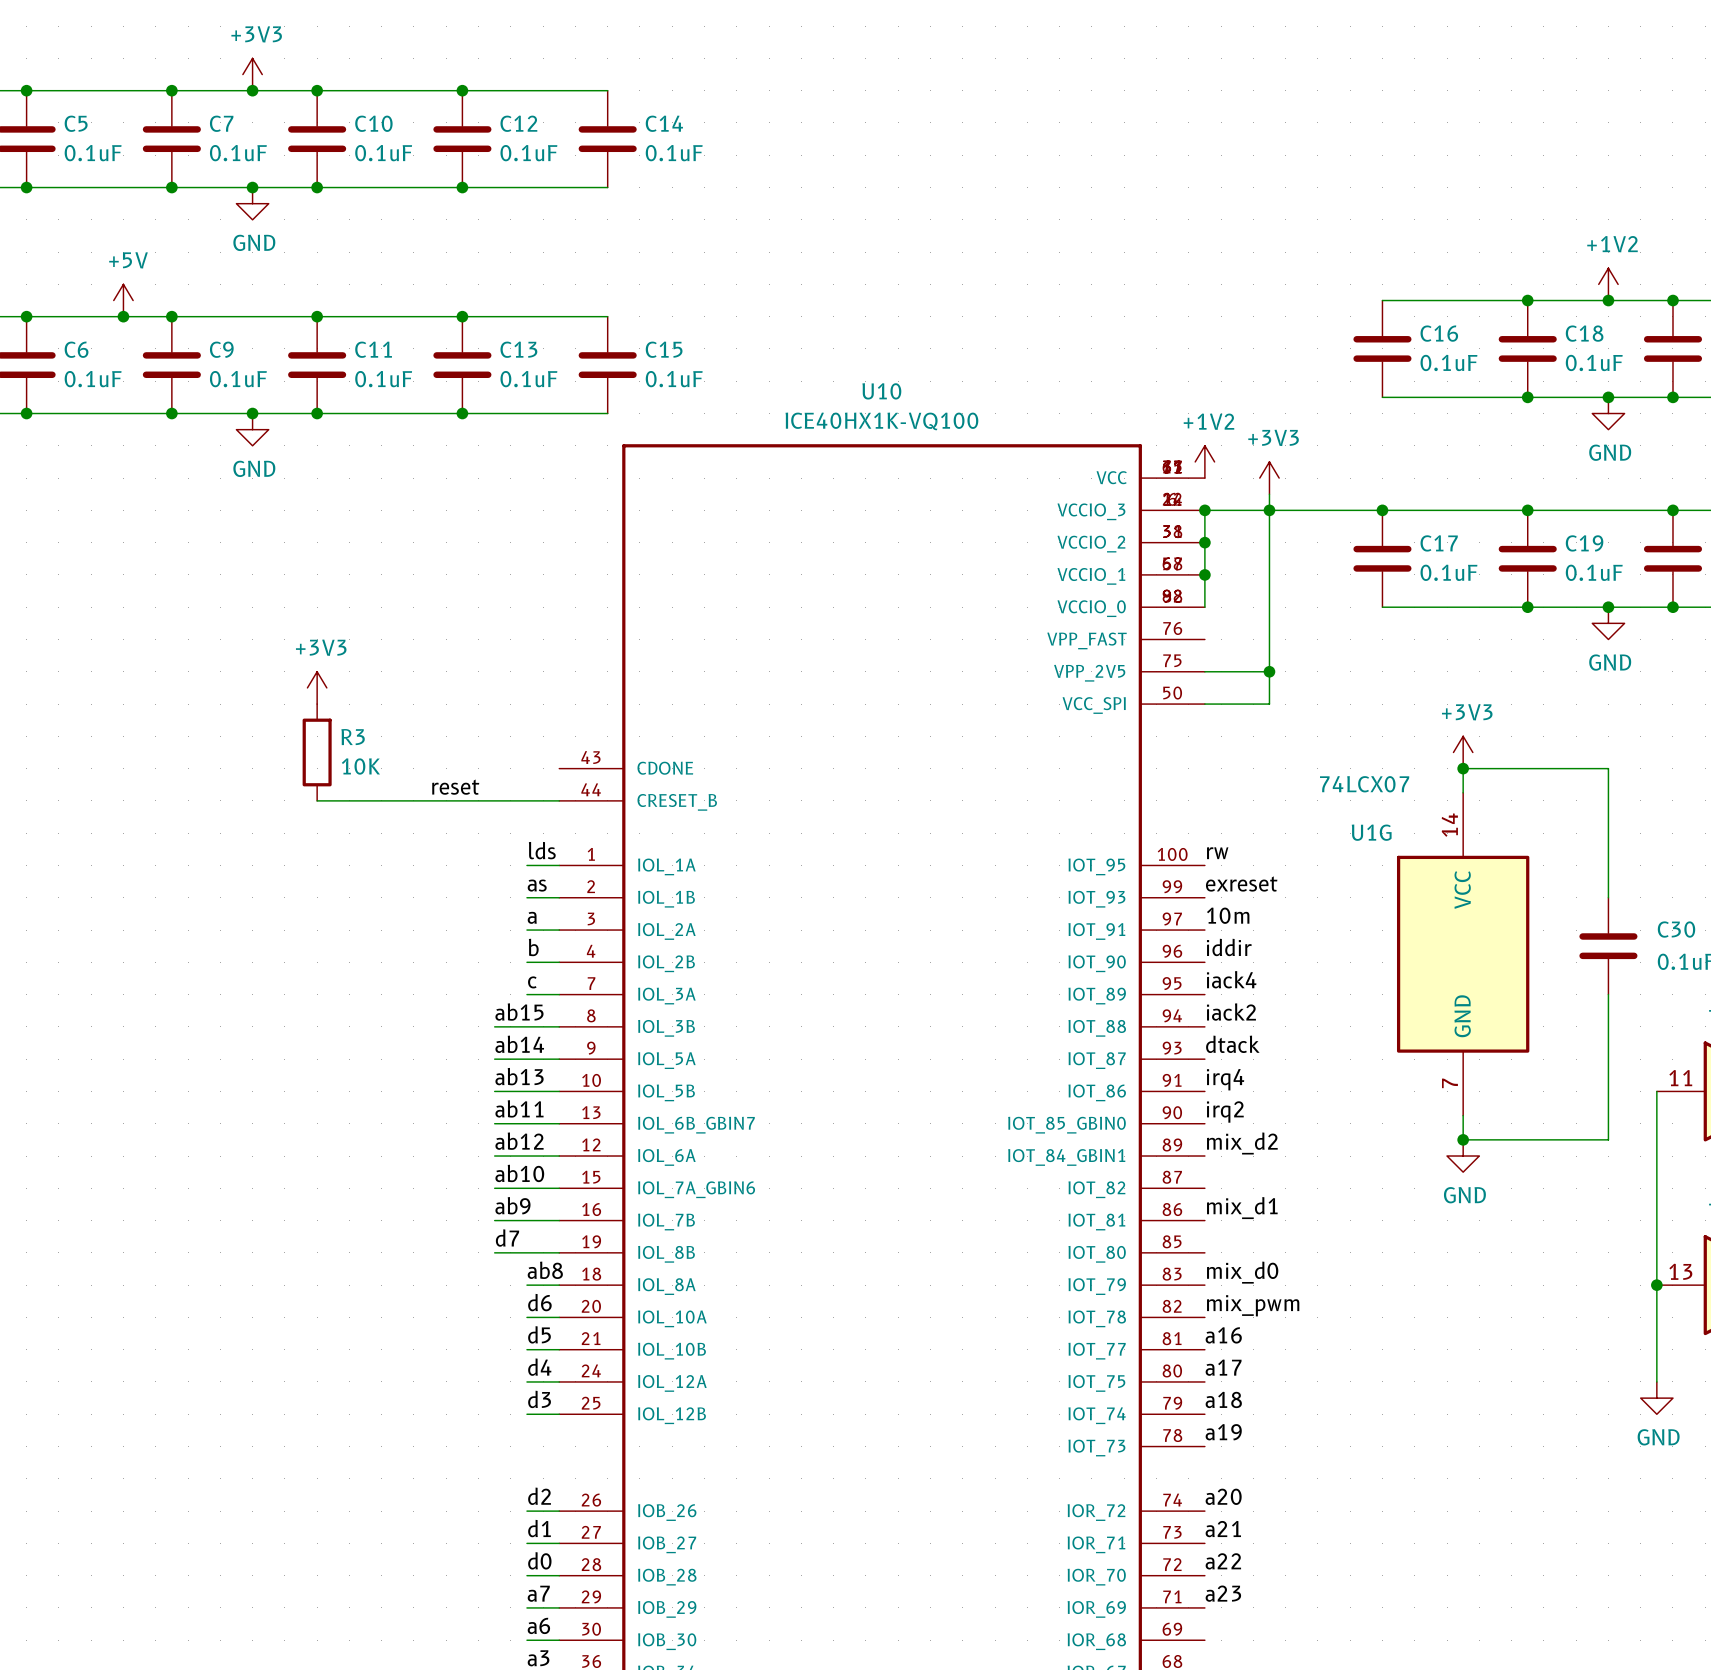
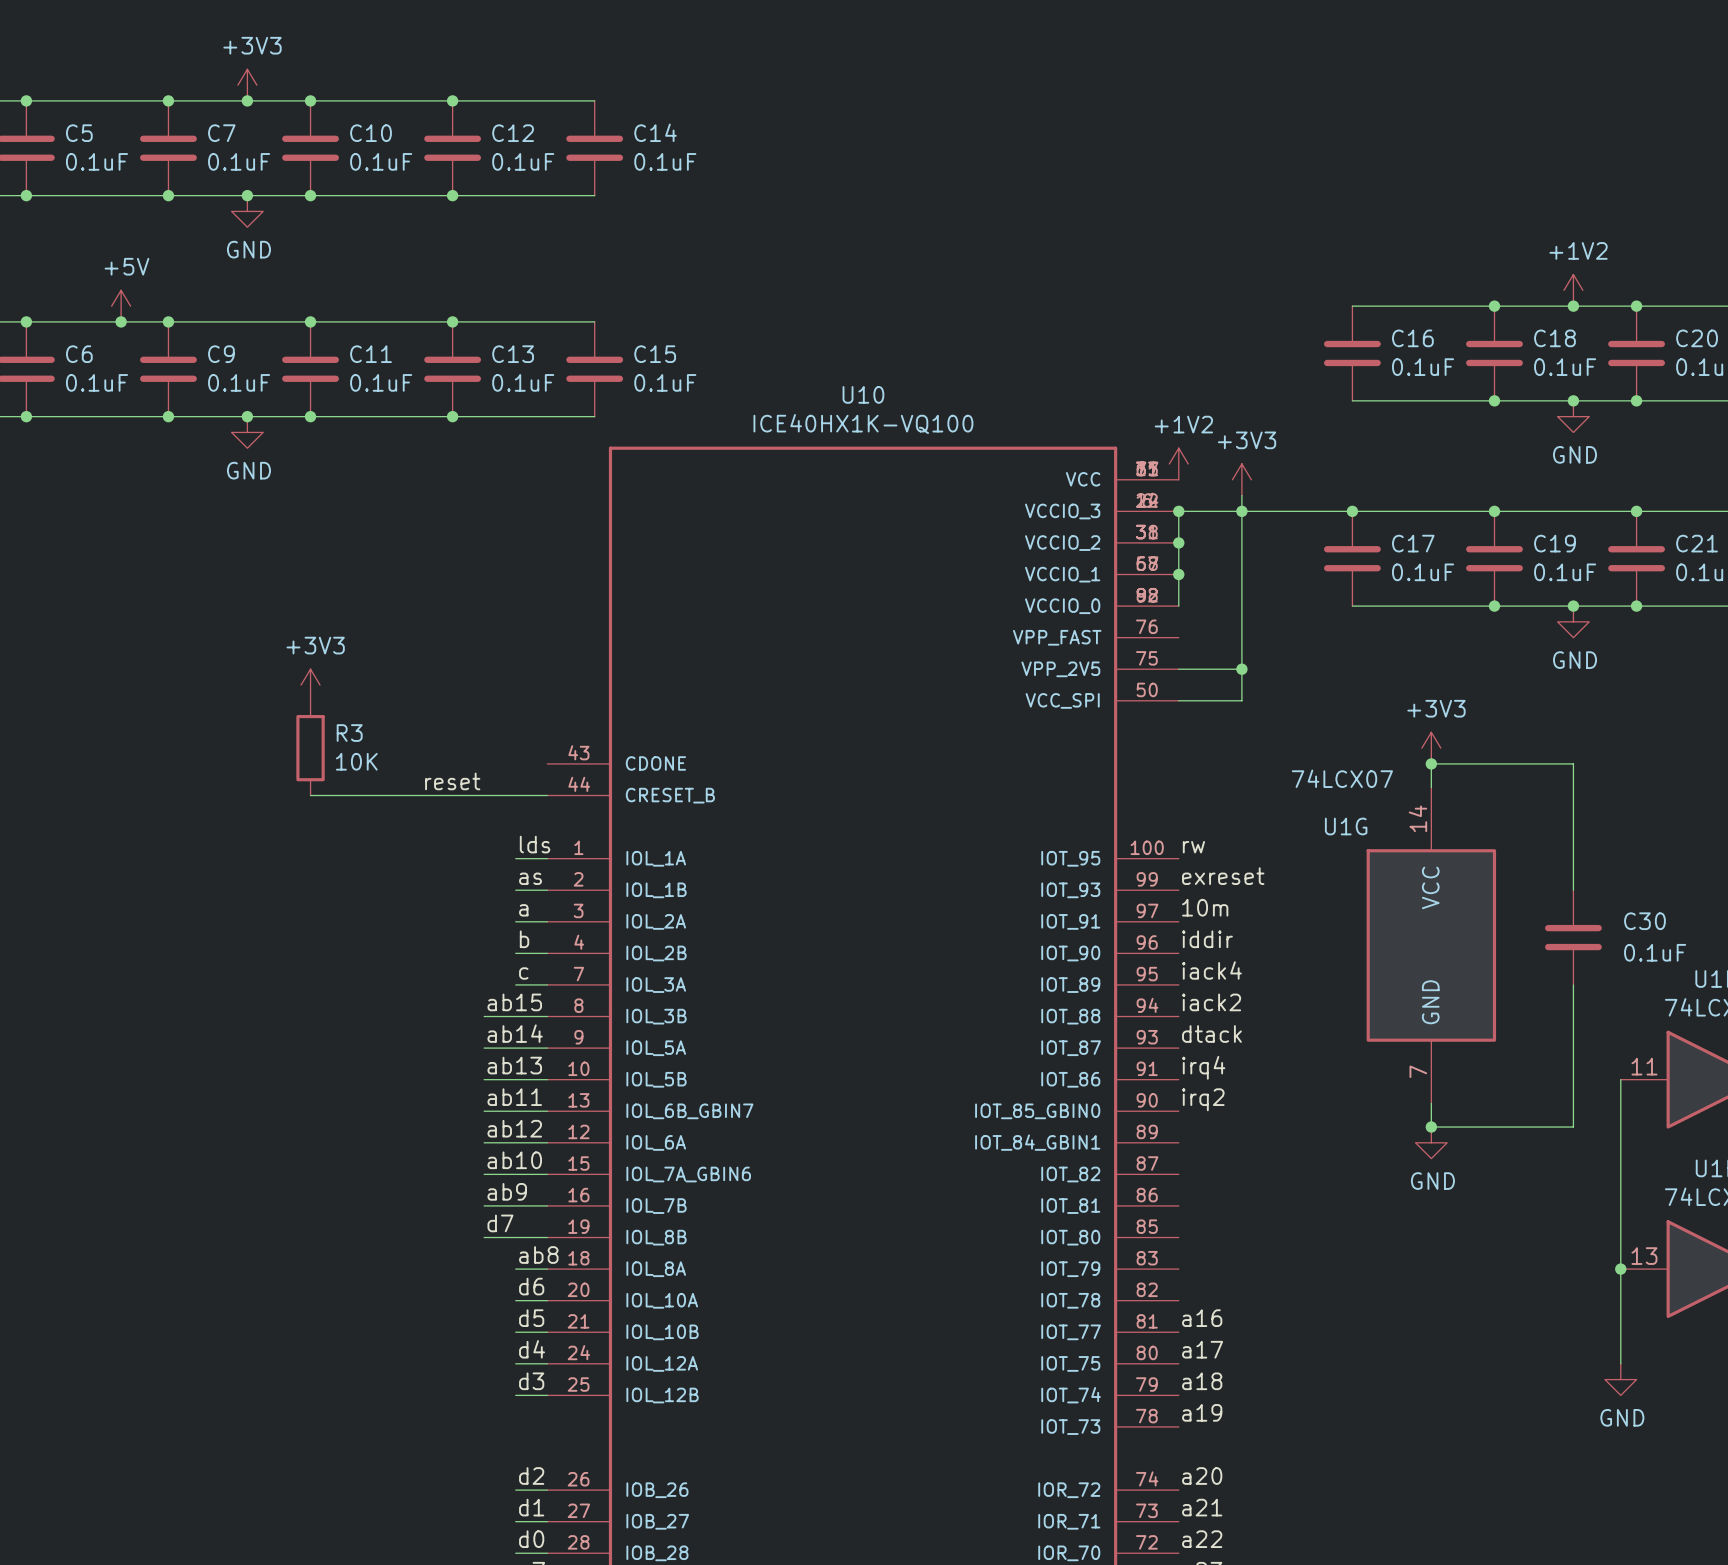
label: mix_d2 (1242, 1143) -> none
label: mix_d1 (1242, 1208) -> none
label: mix_d0 (1242, 1272) -> none
label: mix_pwm (1253, 1305) -> none

